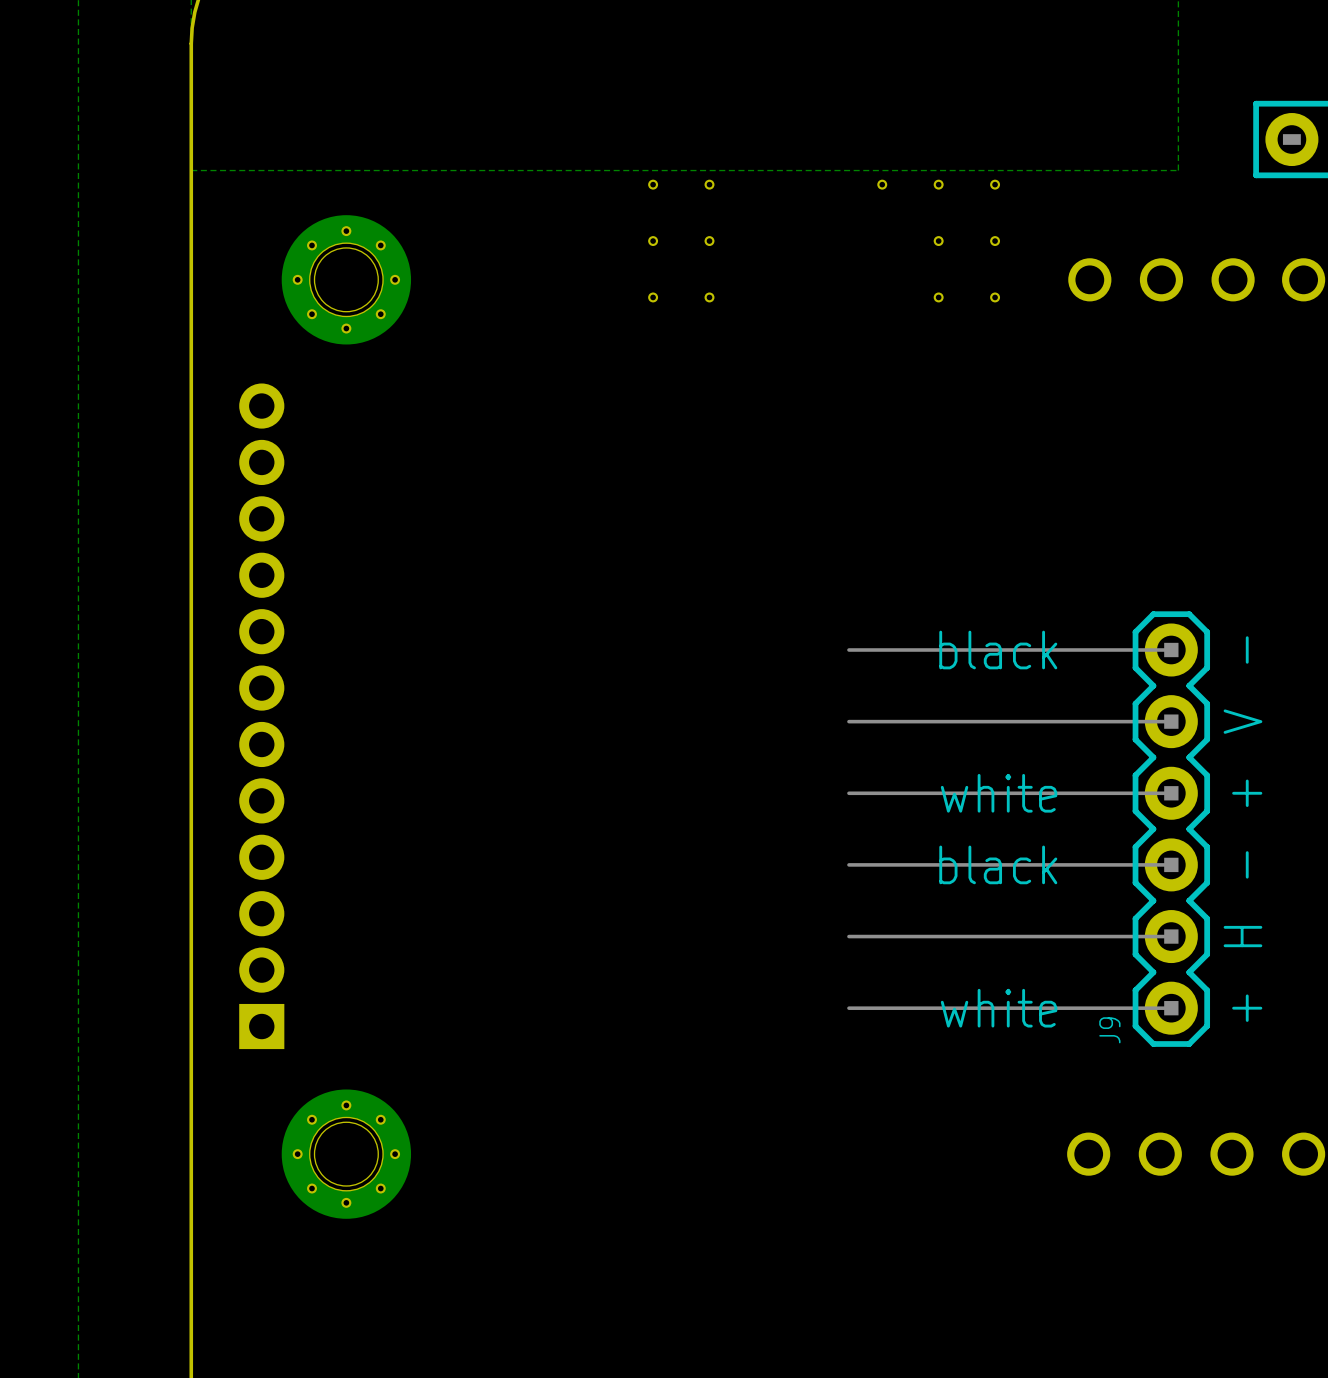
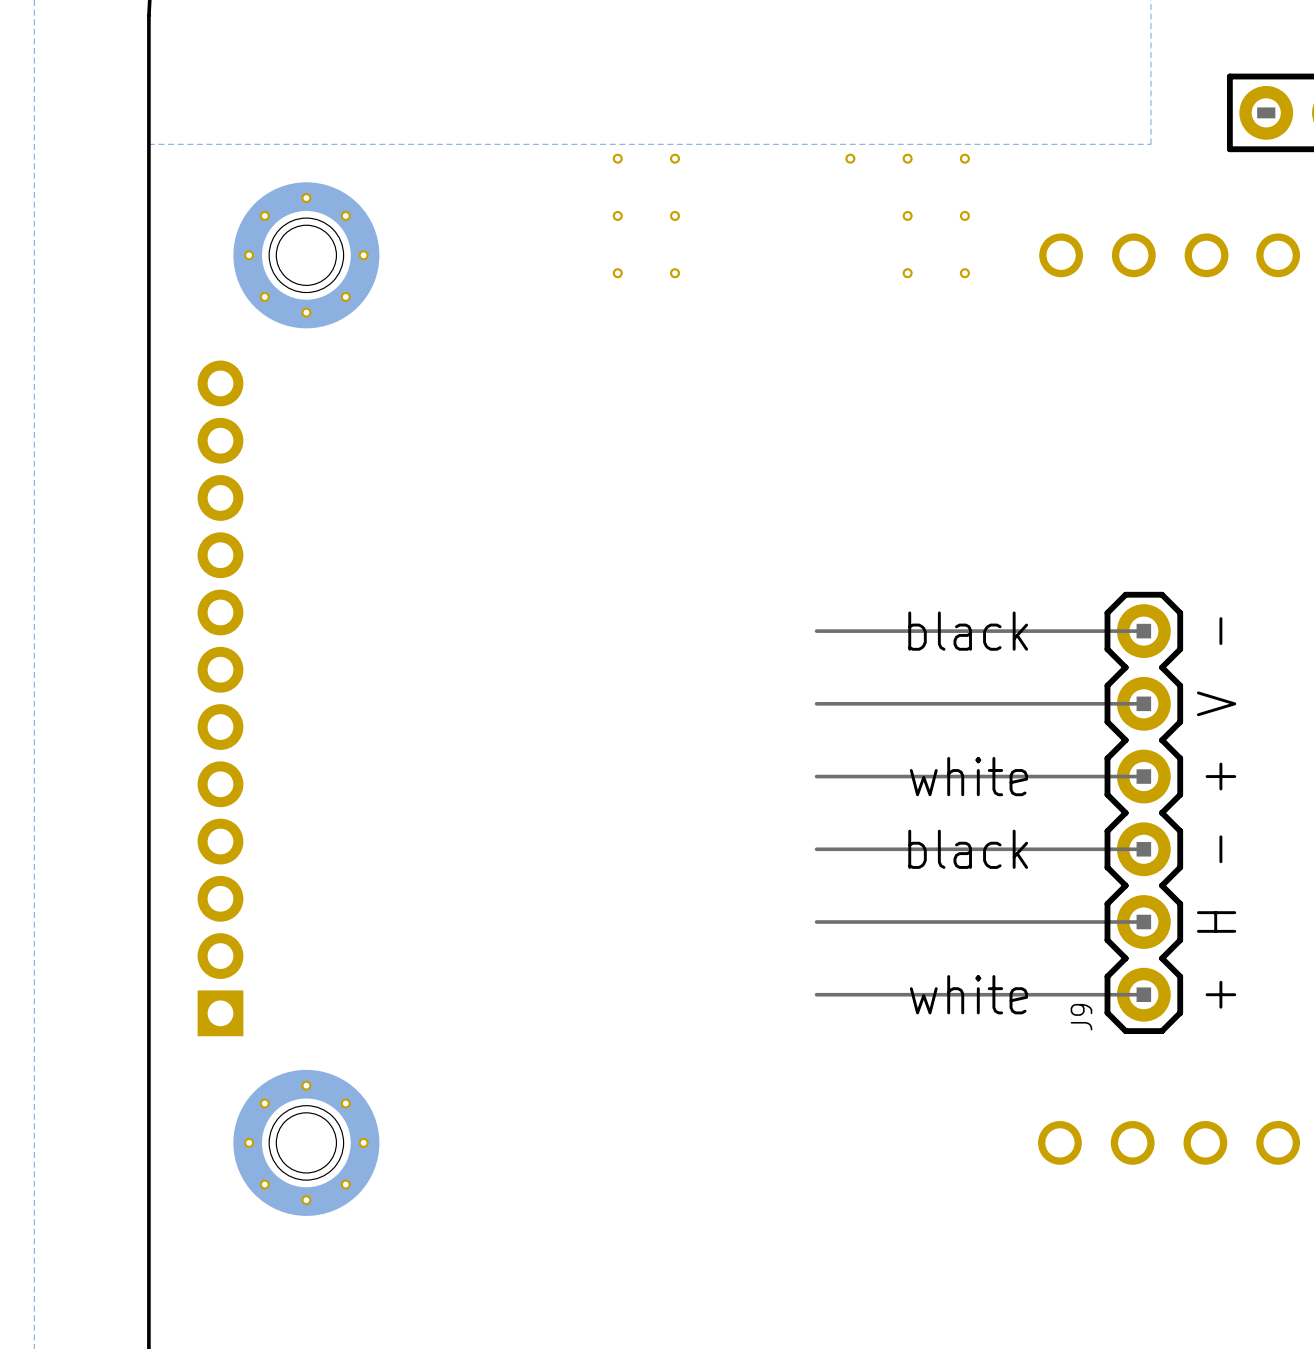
part footprint: [281, 215, 412, 345] -> [233, 182, 380, 329]
part footprint: [281, 1089, 412, 1219] -> [233, 1069, 380, 1216]

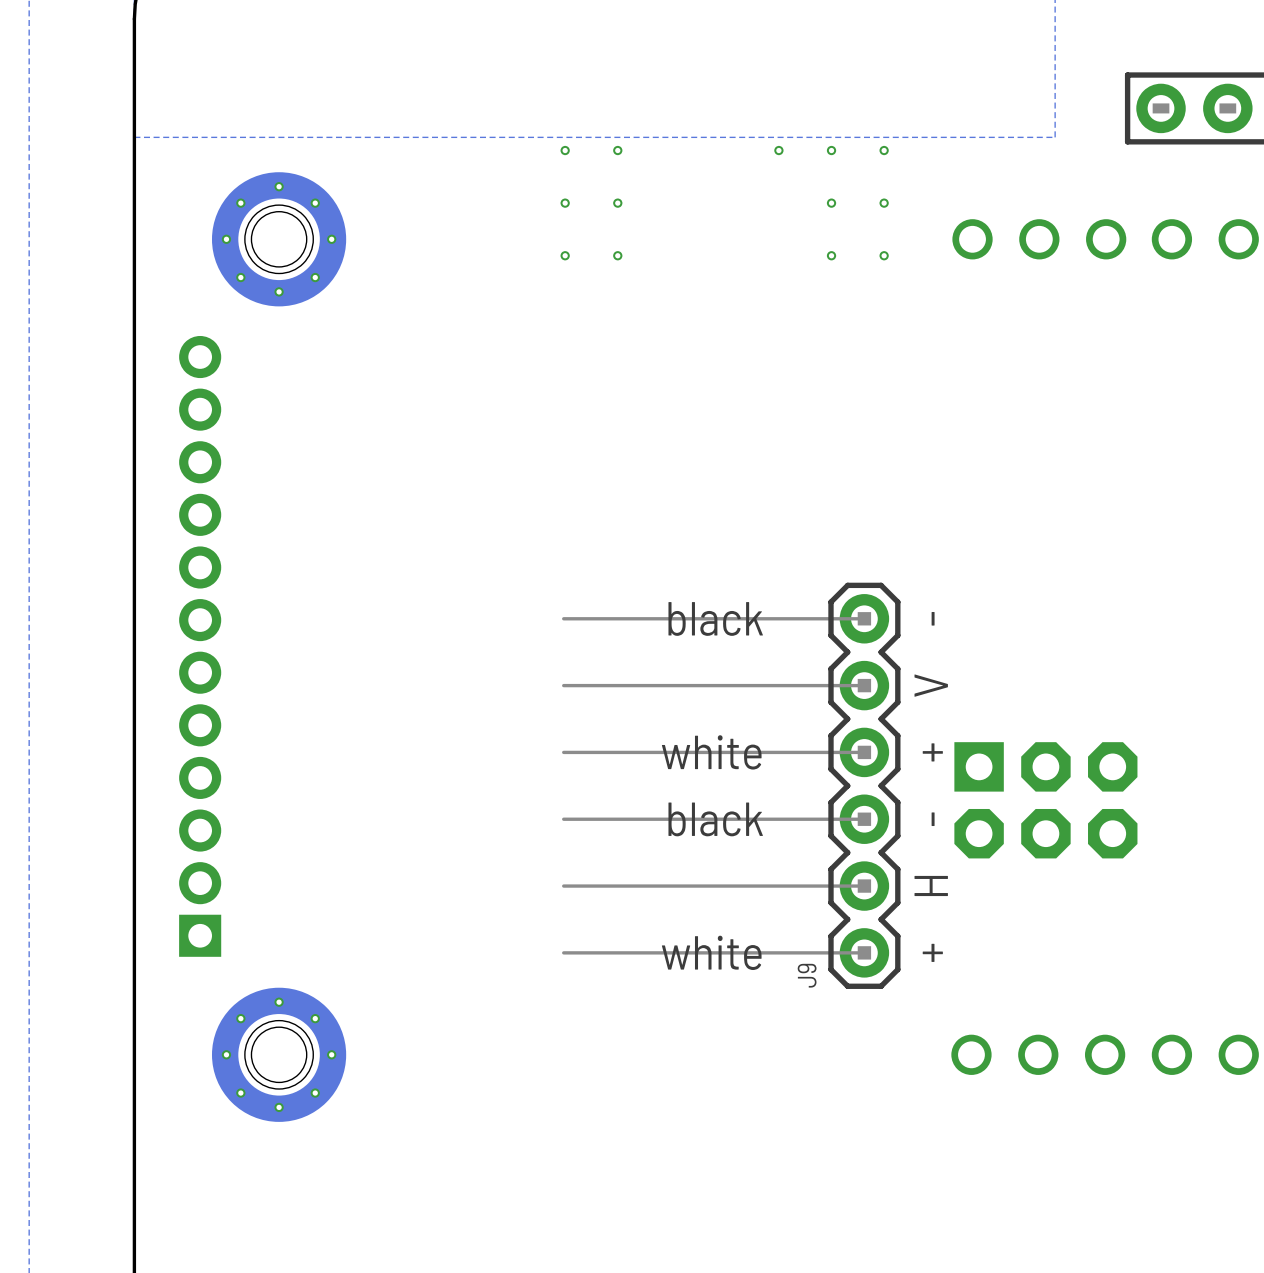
J9 position: (998, 812) -> (731, 785)
part: none -> (1045, 800)

